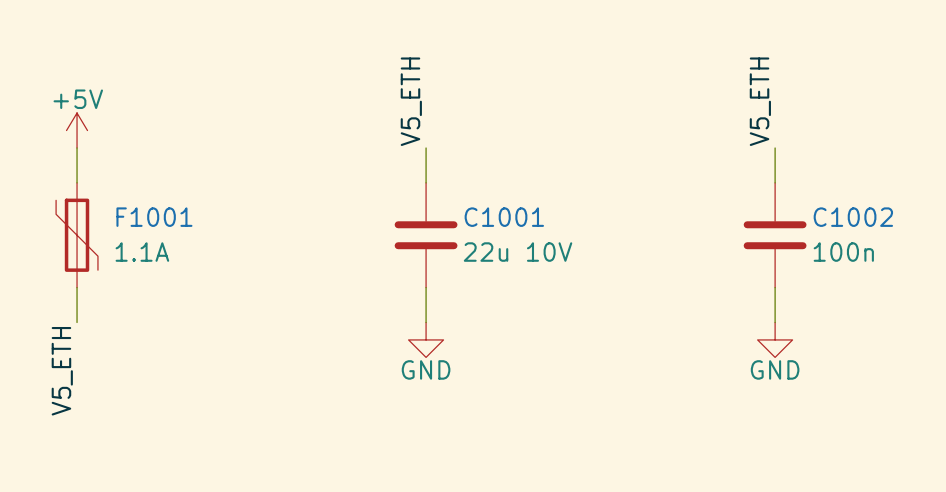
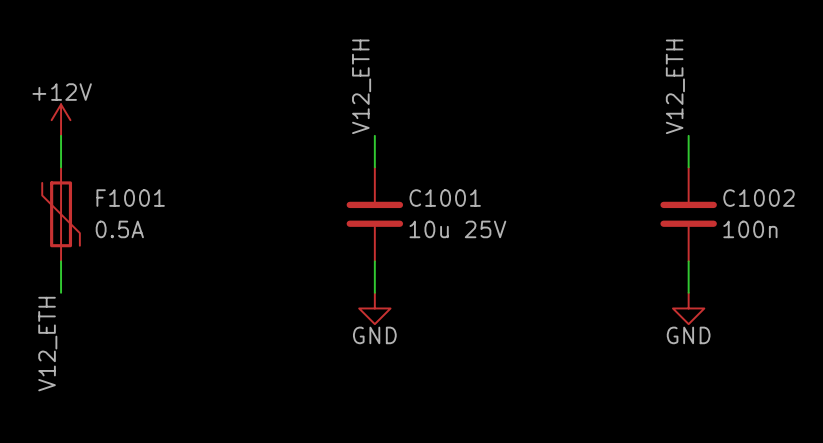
label: V5_ETH (411, 101) -> V12_ETH (361, 86)
label: V5_ETH (760, 101) -> V12_ETH (675, 86)
power symbol: +5V (77, 130) -> +12V (61, 120)
F1001 value: 1.1A (142, 252) -> 0.5A (119, 229)
C1001 value: 22u 10V (518, 252) -> 10u 25V (457, 229)
label: V5_ETH (62, 371) -> V12_ETH (47, 344)

